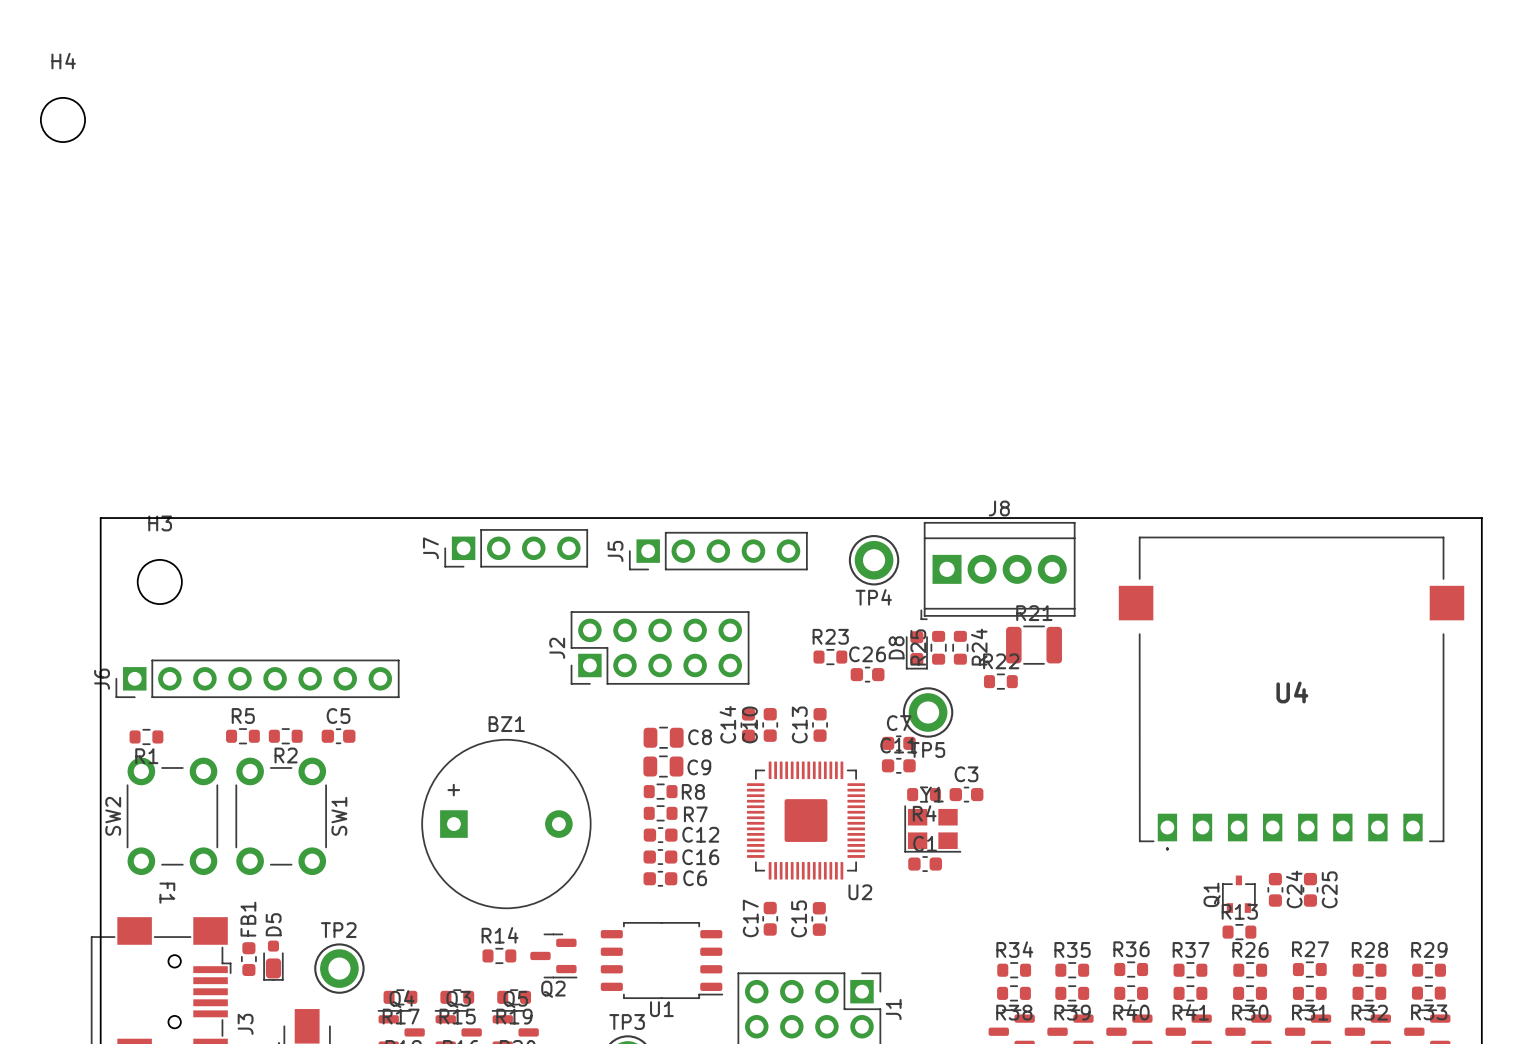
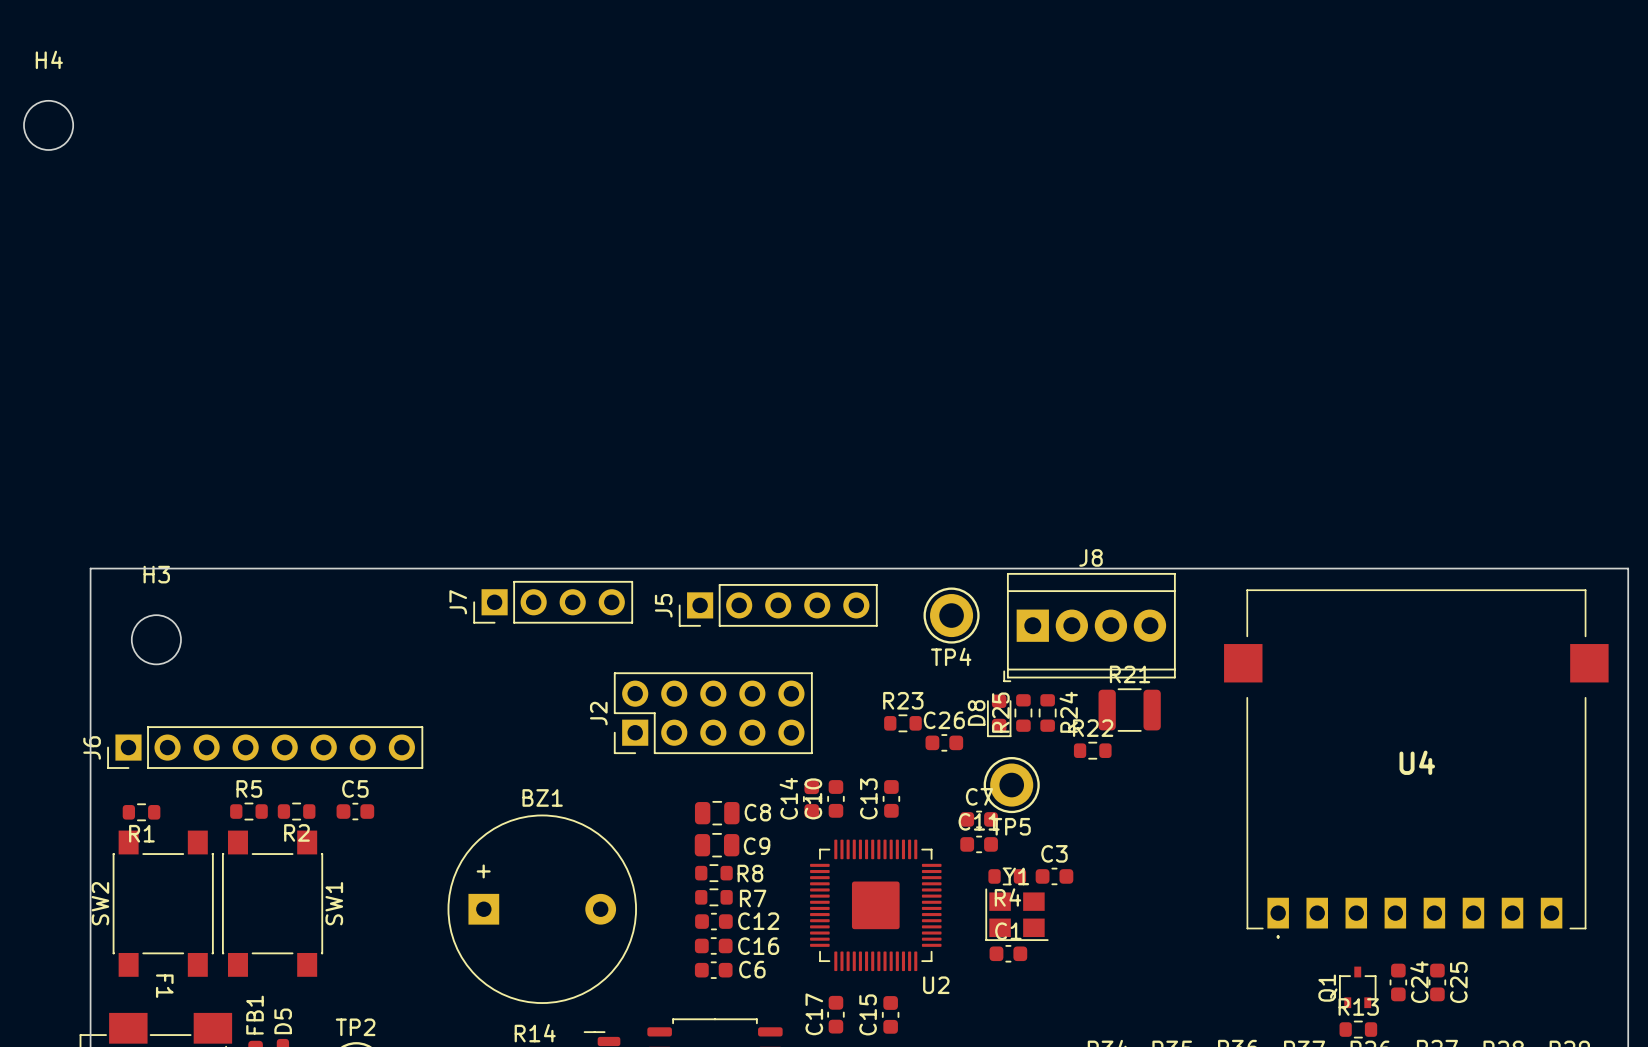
SW2 footprint: [126, 757, 219, 876] -> [112, 830, 214, 977]
SW1 footprint: [235, 757, 327, 876] -> [221, 830, 324, 977]

